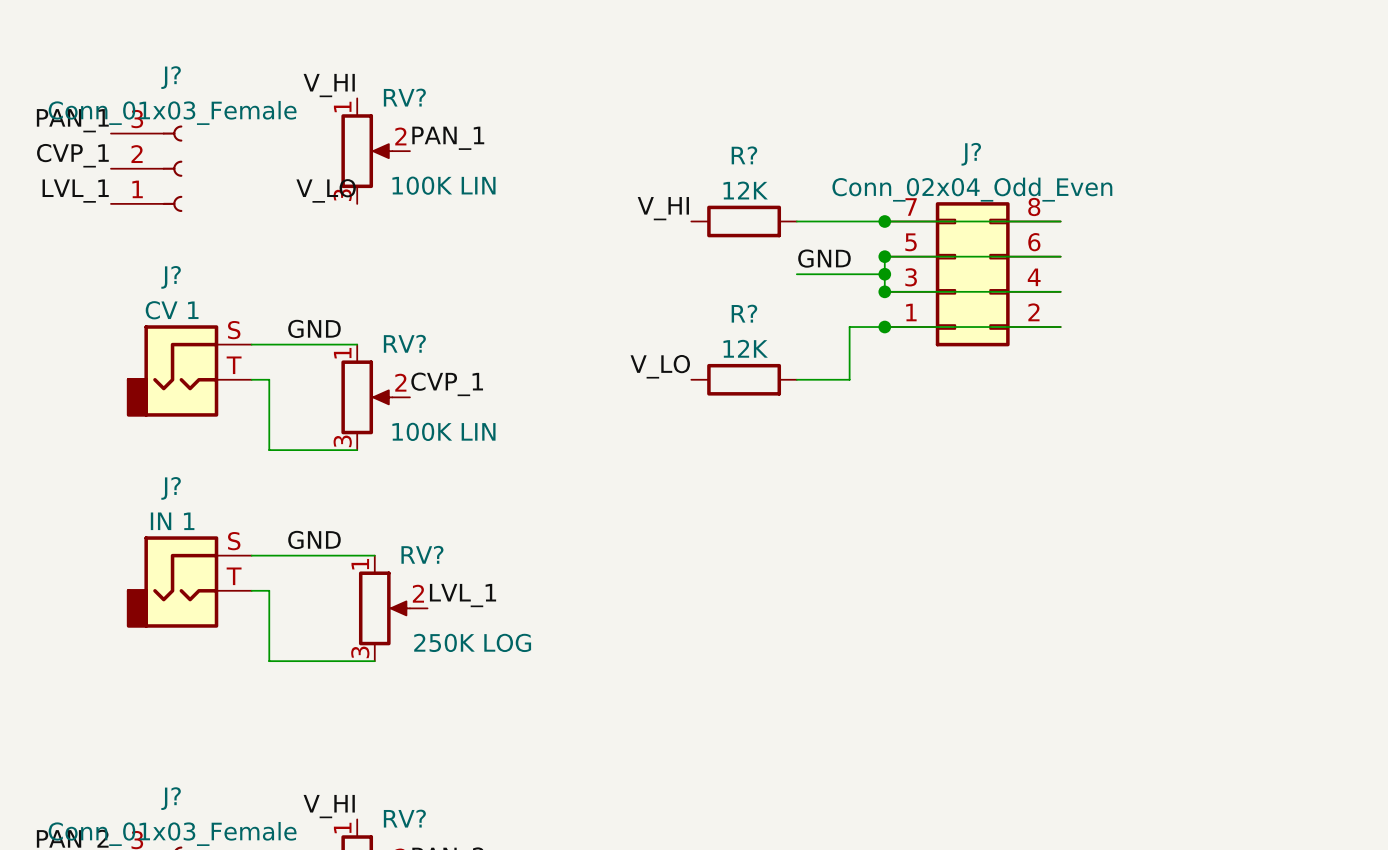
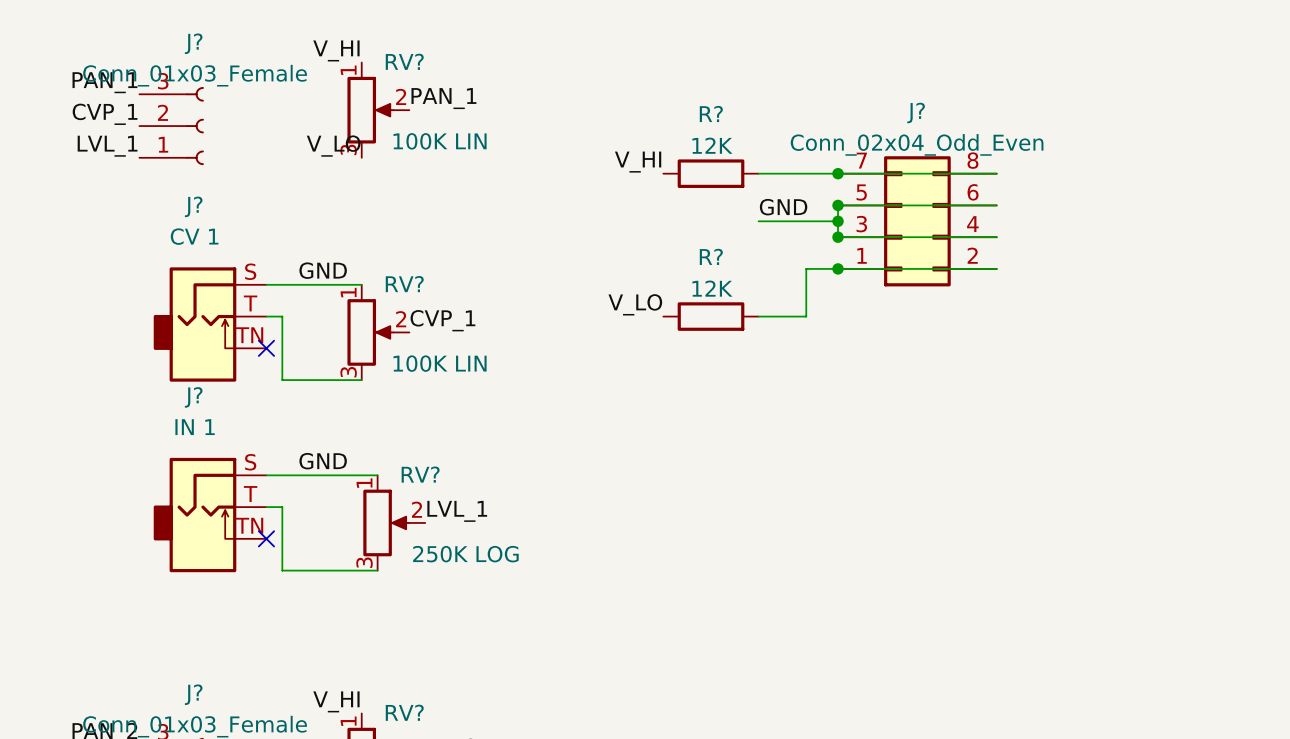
J?: CV 1 (189, 370) -> none
J?: none -> CV 1 (210, 324)
no-connect mark: none -> (266, 348)
J?: IN 1 (189, 582) -> none
J?: none -> IN 1 (210, 515)
no-connect mark: none -> (266, 538)

